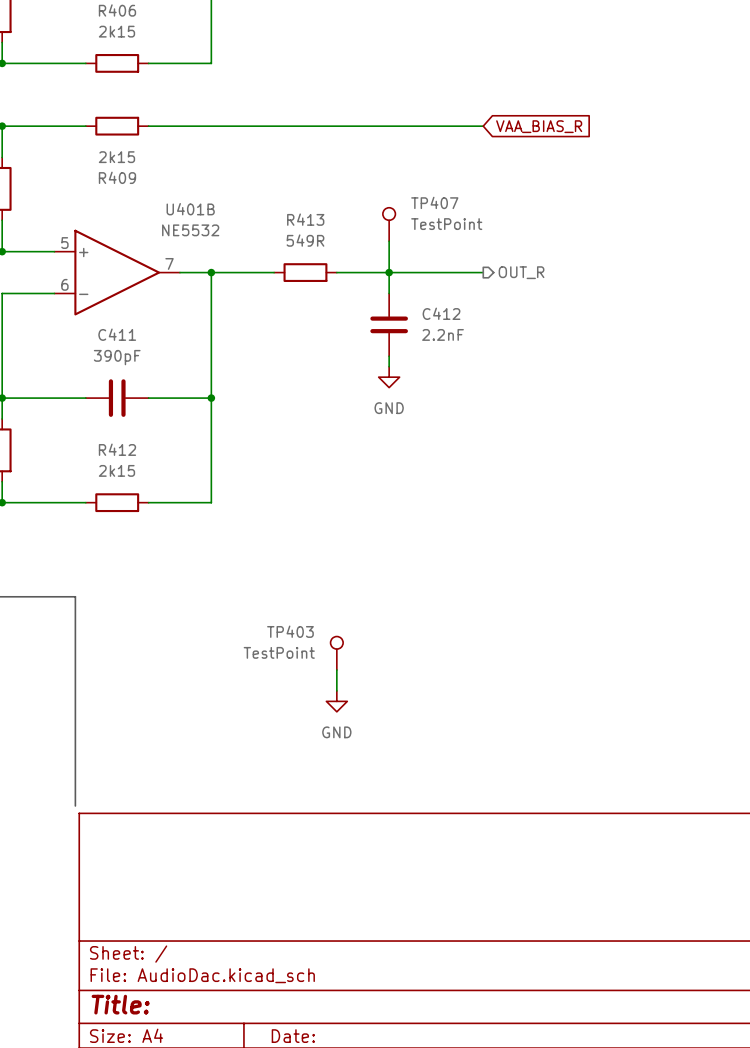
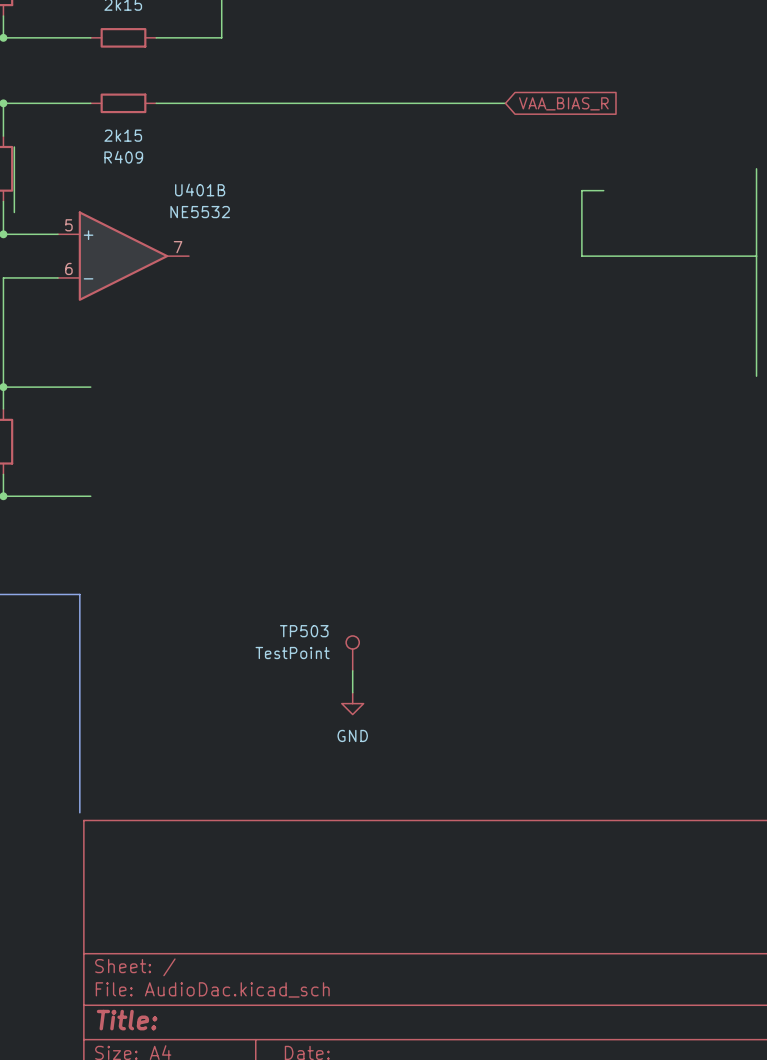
wire: none -> (14, 146) (14, 212)
wire: none -> (756, 168) (756, 376)
wire: none -> (603, 190) (581, 190) (581, 256) (756, 256)
TP407: TestPoint (389, 224) -> none
wire: (389, 241) (389, 293) -> none
wire: (179, 272) (274, 272) -> none
wire: (211, 272) (211, 502) (148, 502) -> none
junction: (211, 272) -> none
R413: 549R (305, 272) -> none
wire: (336, 272) (483, 272) -> none
junction: (389, 272) -> none
hierarchical label: OUT_R (521, 272) -> none
C412: 2.2nF (389, 324) -> none
wire: (389, 356) (389, 366) -> none
power symbol: GND (389, 377) -> none
C411: 390pF (117, 398) -> none
wire: (148, 398) (211, 398) -> none
junction: (211, 398) -> none
R412: 2k15 (117, 502) -> none
TP403 name: TP403 (290, 631) -> TP503 (304, 631)

